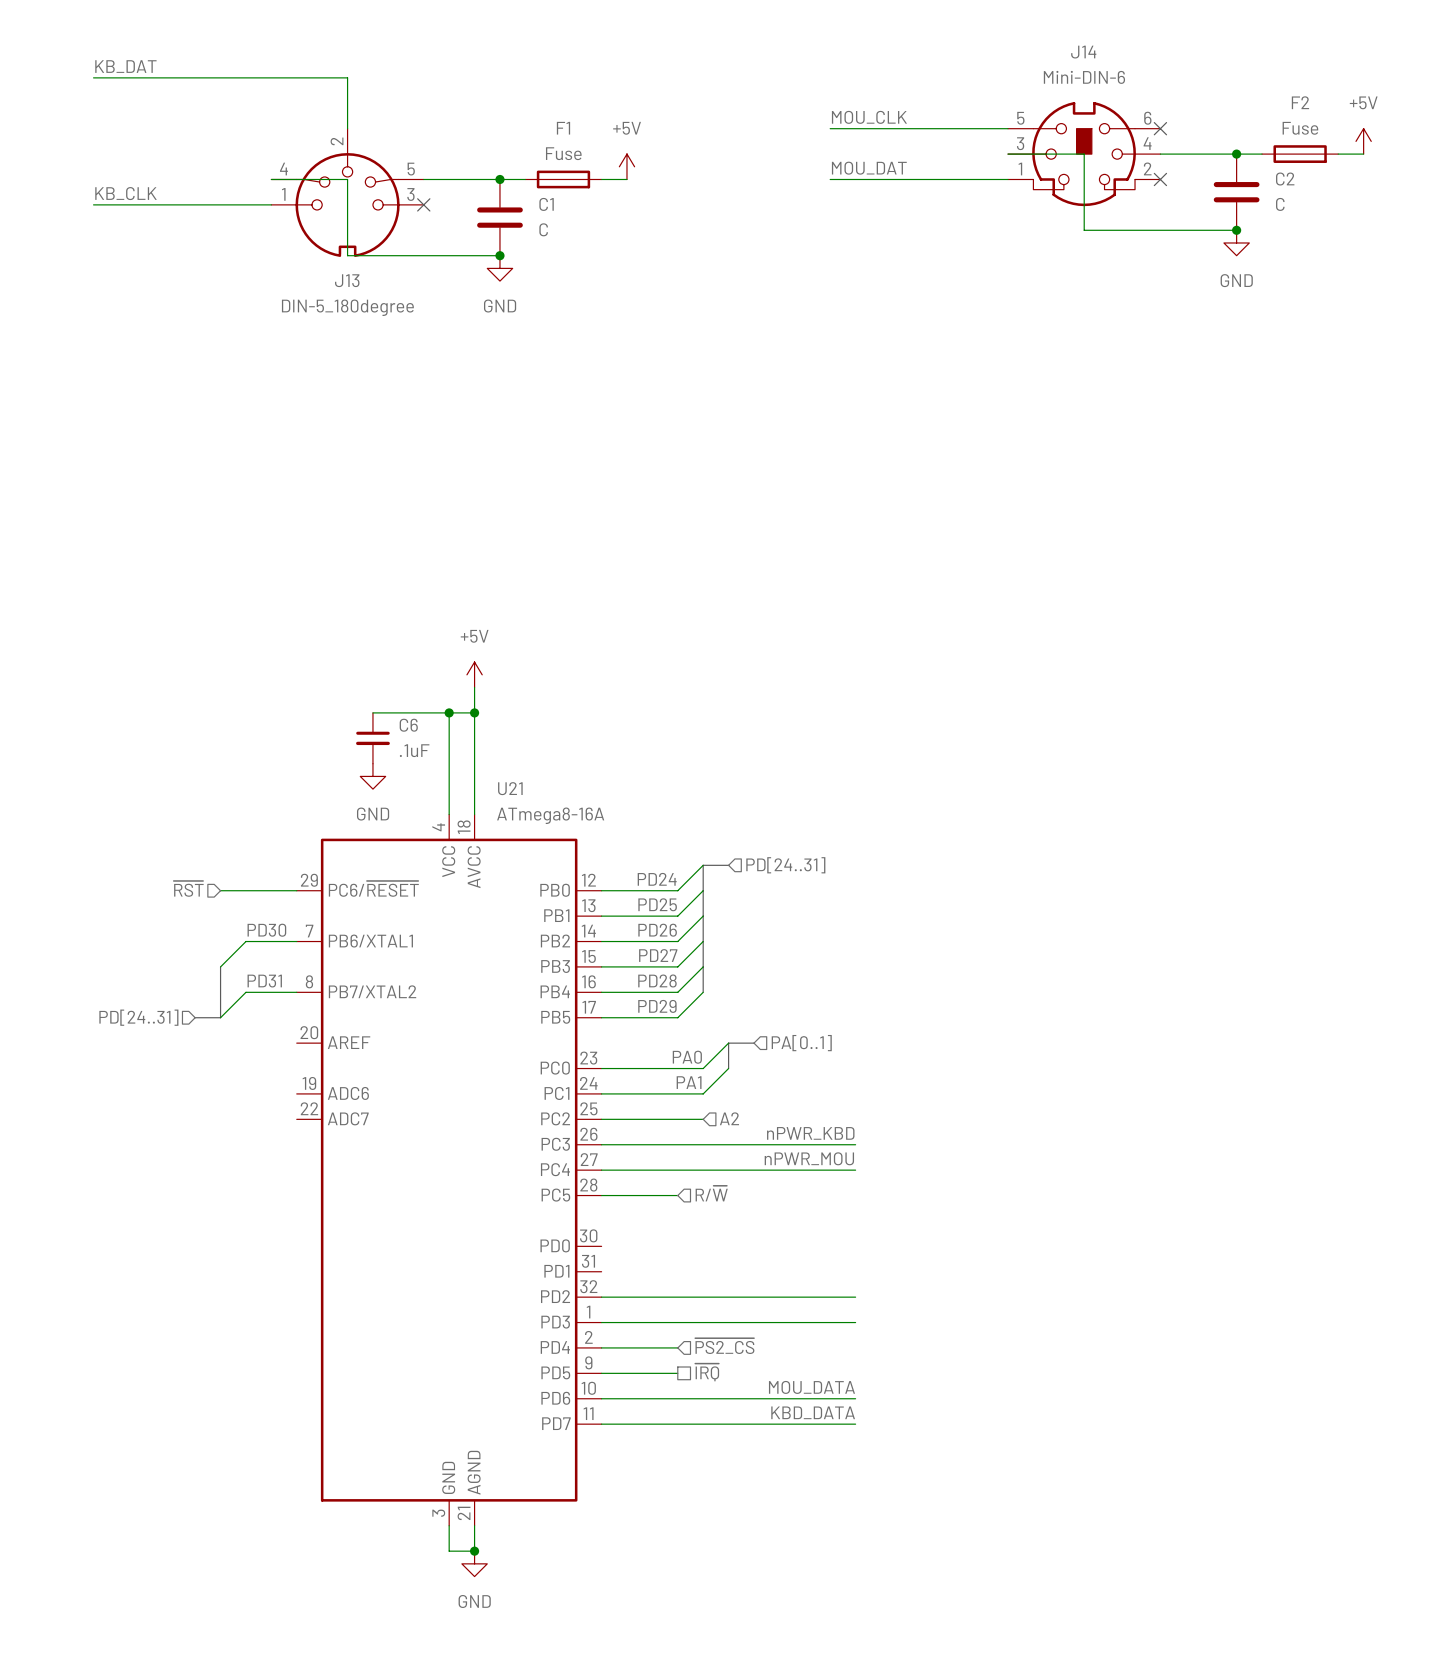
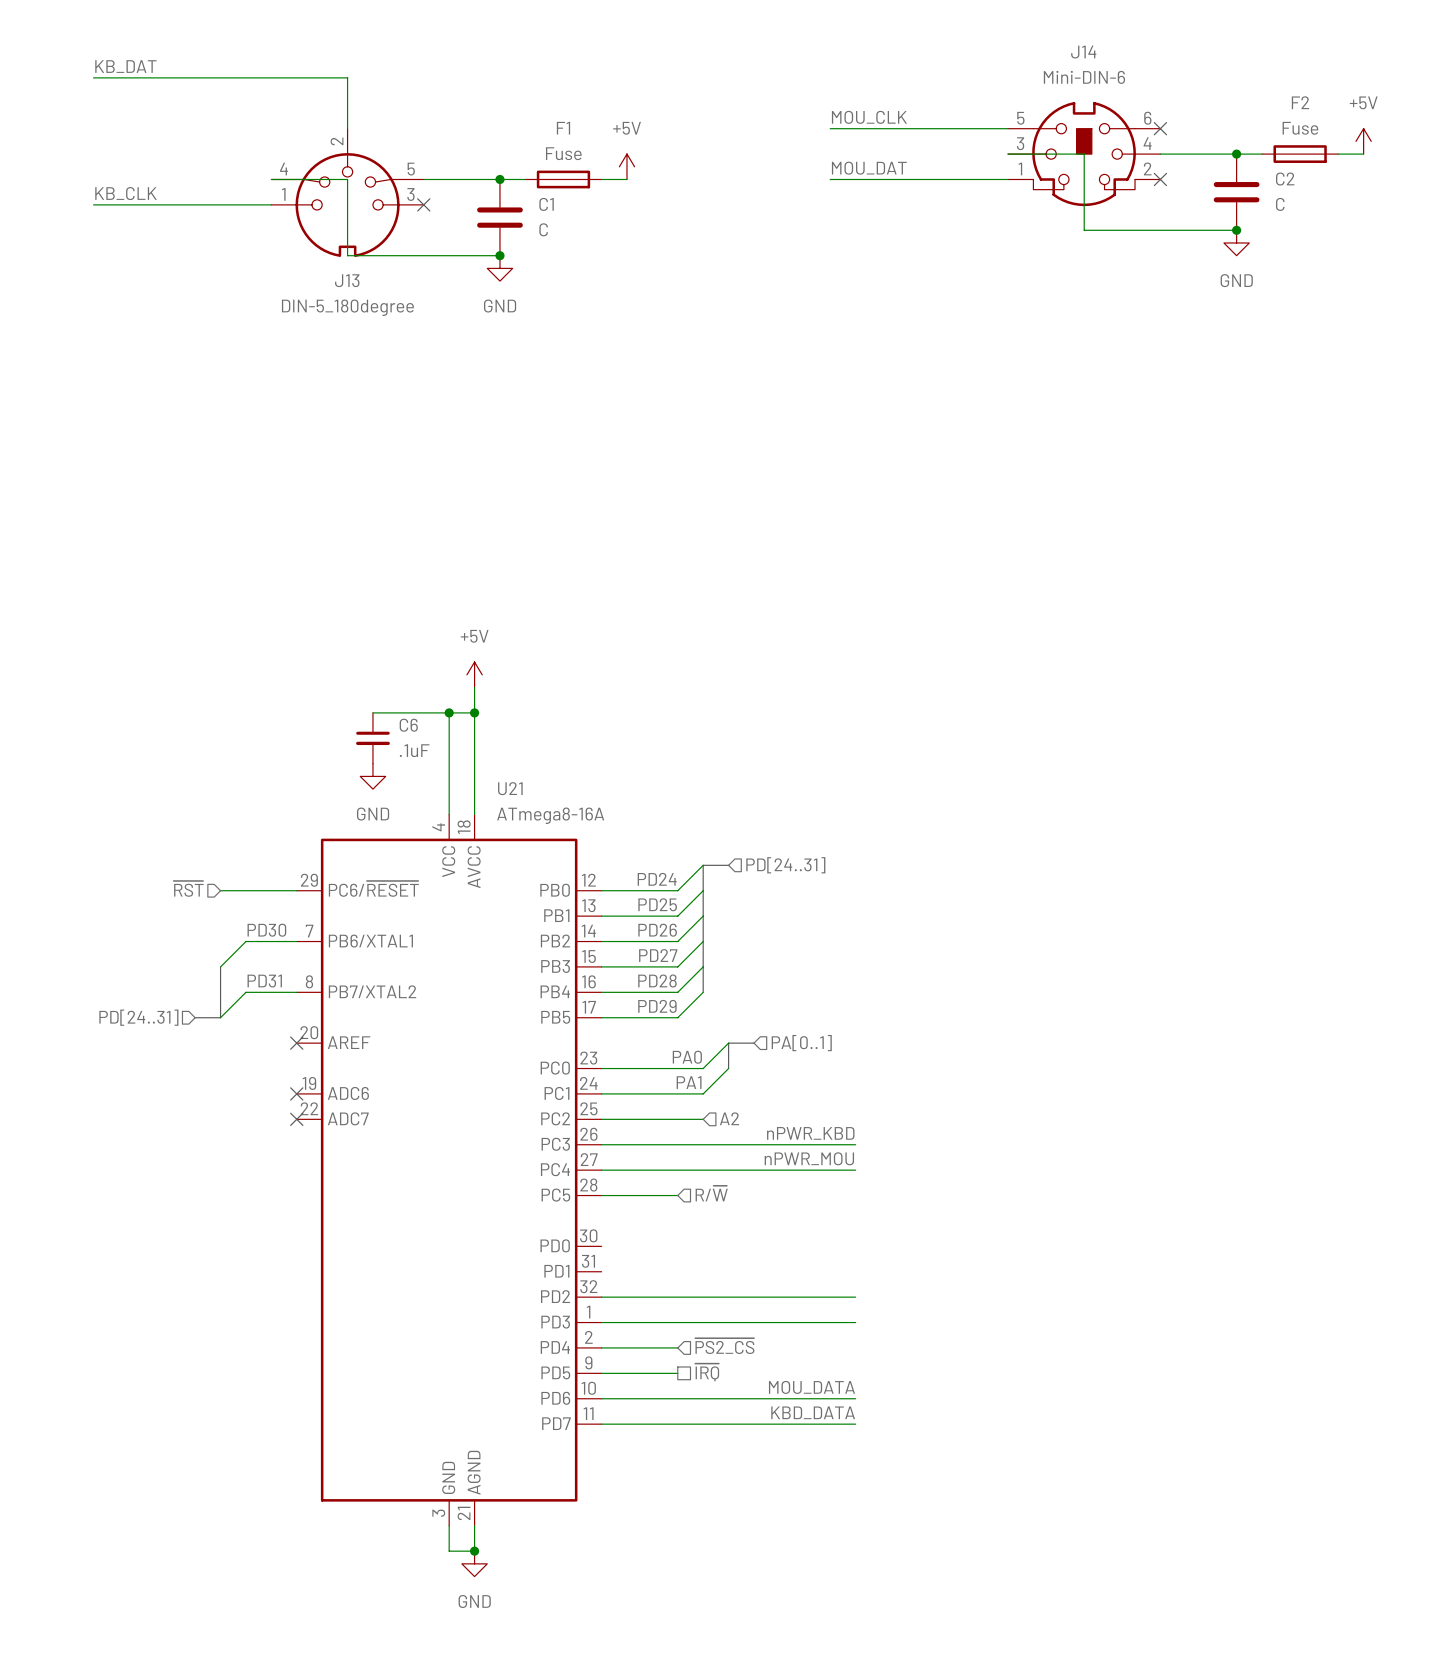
no-connect mark: none -> (296, 1043)
no-connect mark: none -> (296, 1093)
no-connect mark: none -> (296, 1119)

